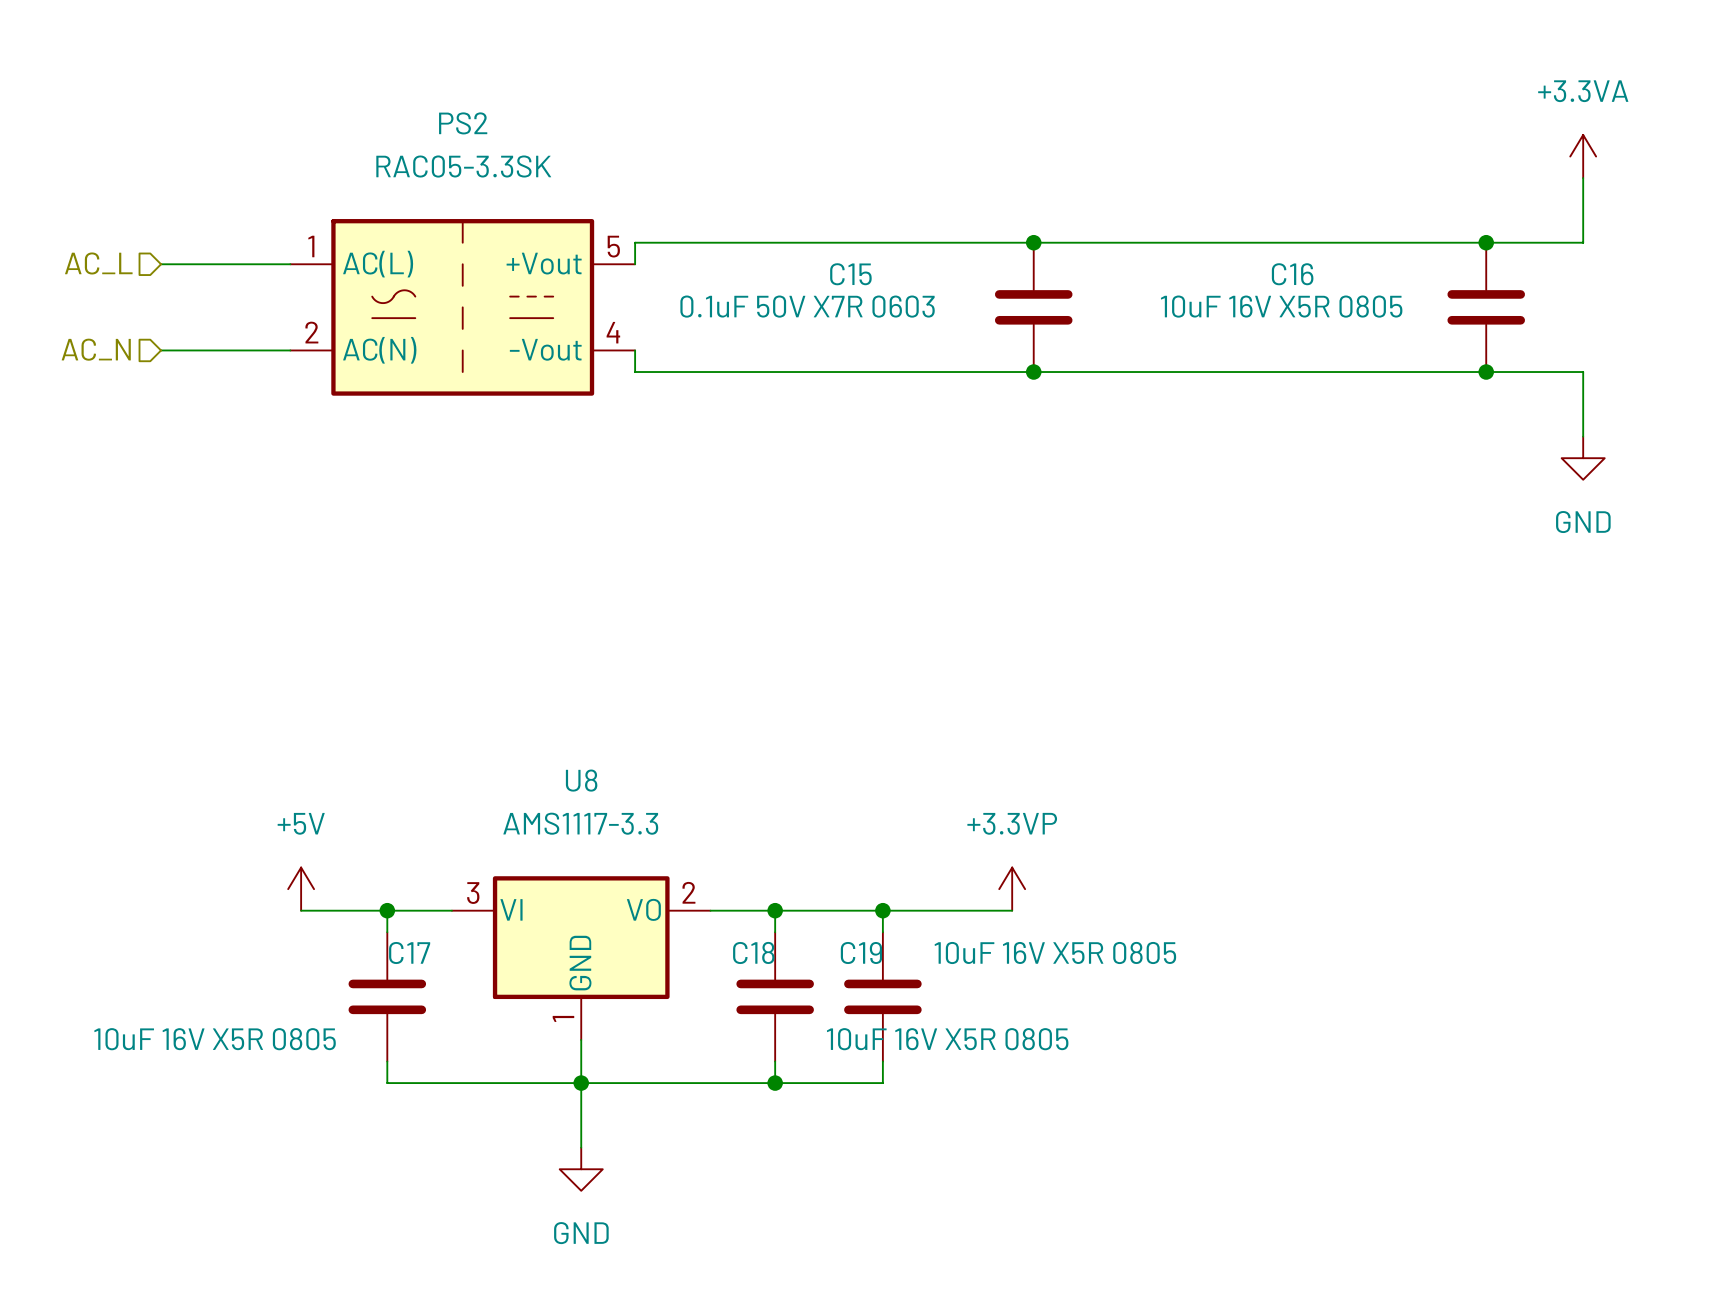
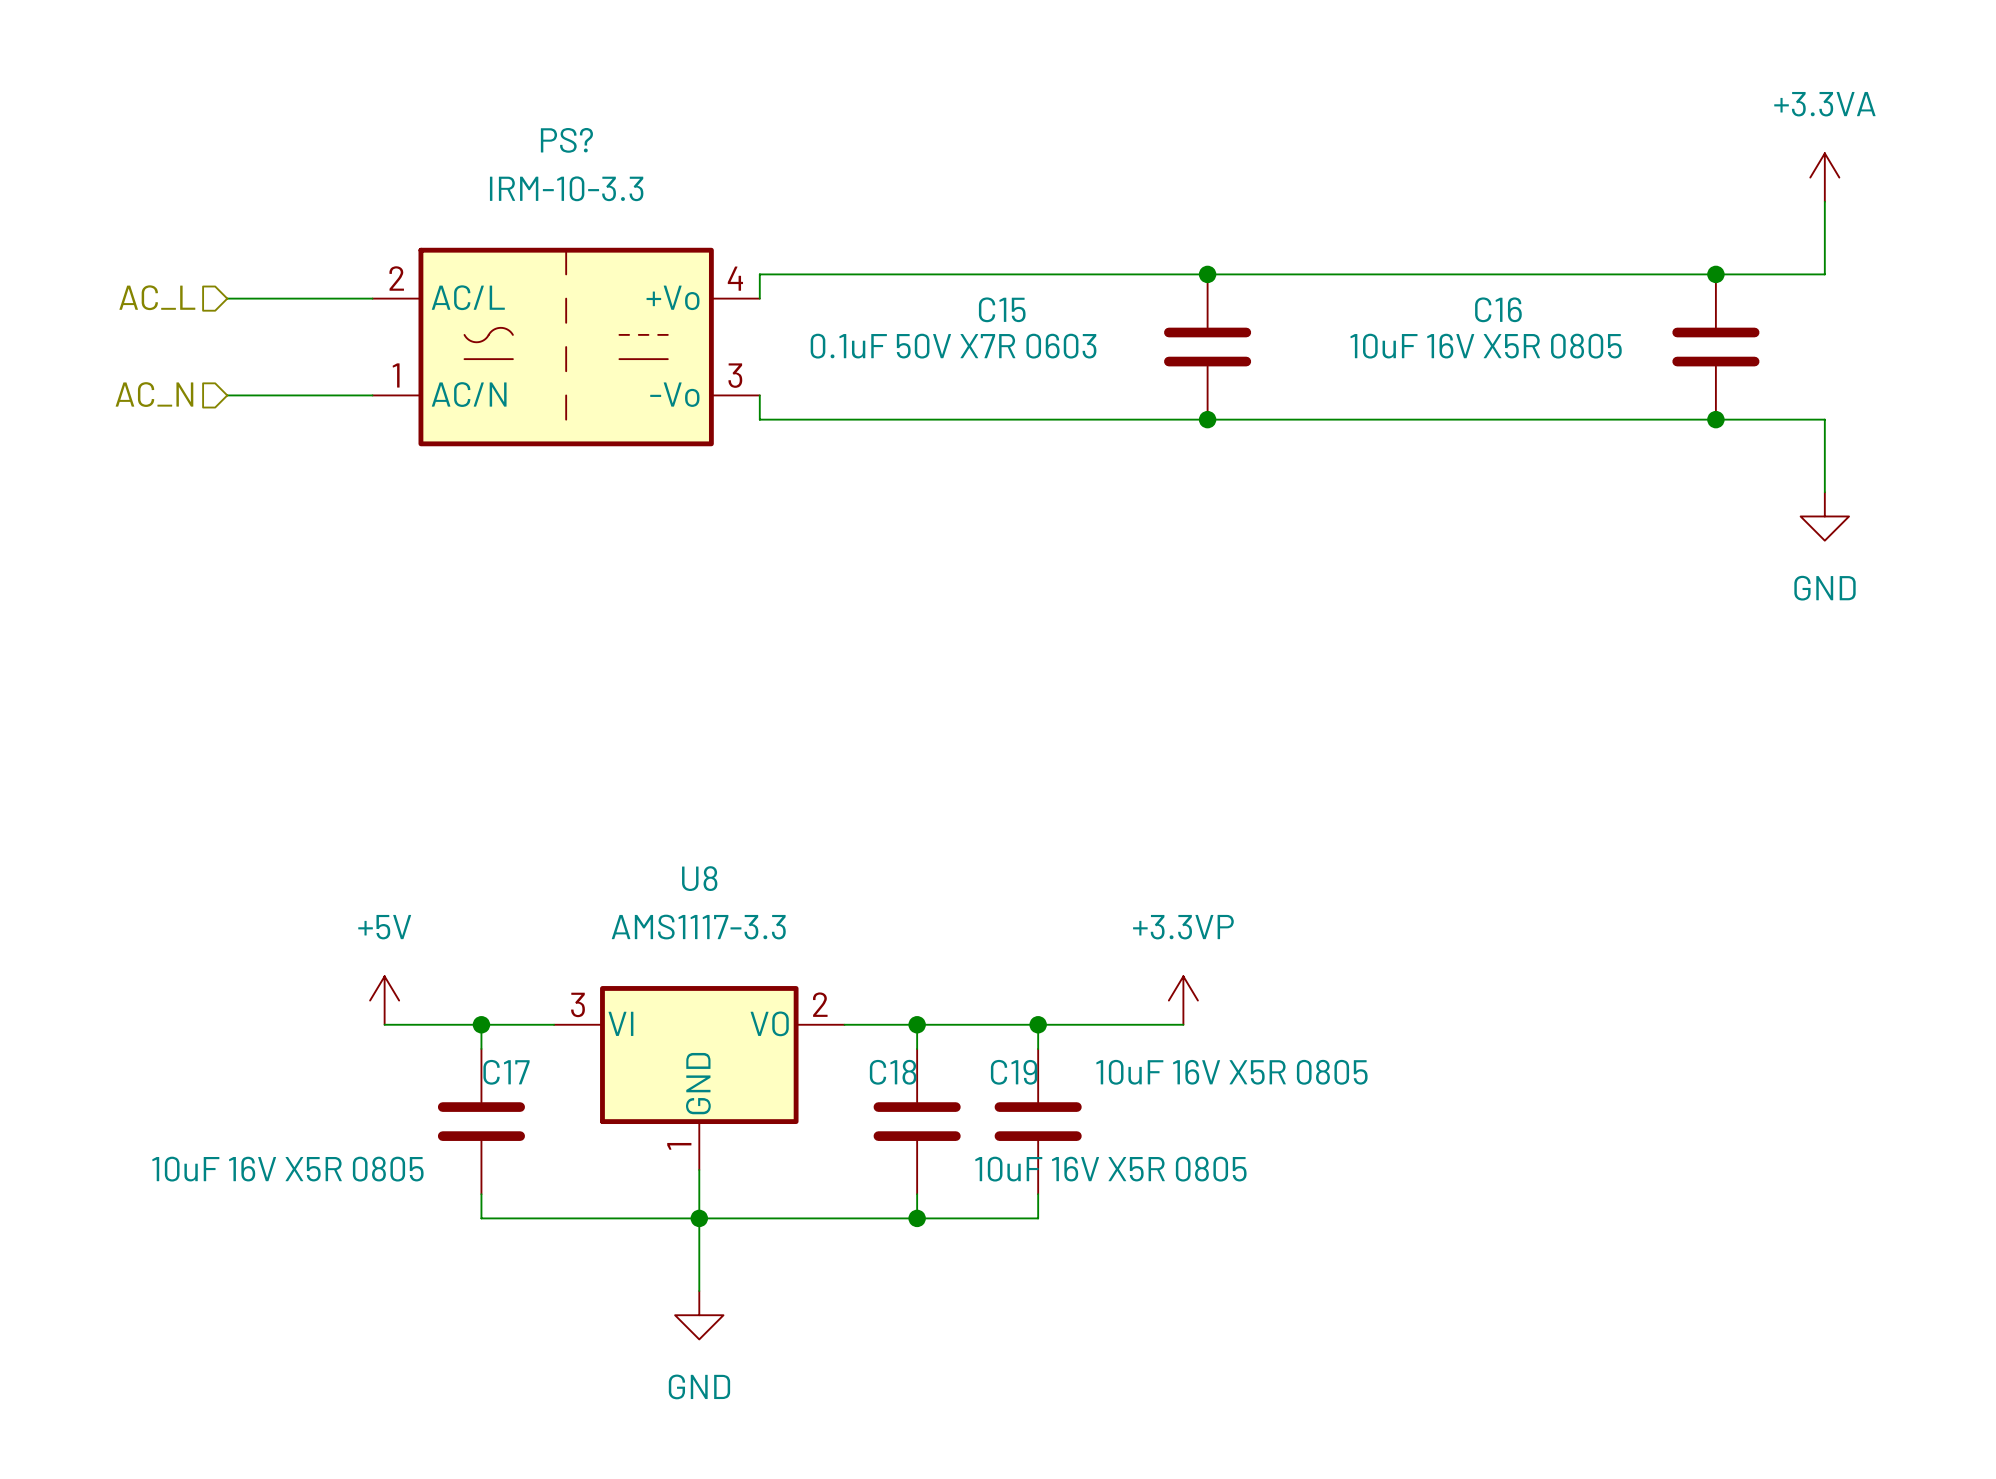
PS2 name: PS2 (463, 123) -> PS? (566, 140)
PS2 value: RAC05-3.3SK (463, 166) -> IRM-10-3.3 (566, 188)
PS2 pin number: 1 (311, 246) -> 2 (396, 278)
PS2 pin number: 5 (613, 246) -> 4 (735, 278)
PS2 pin name: +Vout (544, 263) -> +Vo (673, 297)
PS2 pin name: AC(L) (378, 264) -> AC/L (468, 297)
PS2 pin number: 2 (311, 332) -> 1 (396, 375)
PS2 pin number: 4 (613, 332) -> 3 (735, 375)
PS2 pin name: -Vout (545, 349) -> -Vo (674, 394)
PS2 pin name: AC(N) (379, 350) -> AC/N (469, 394)

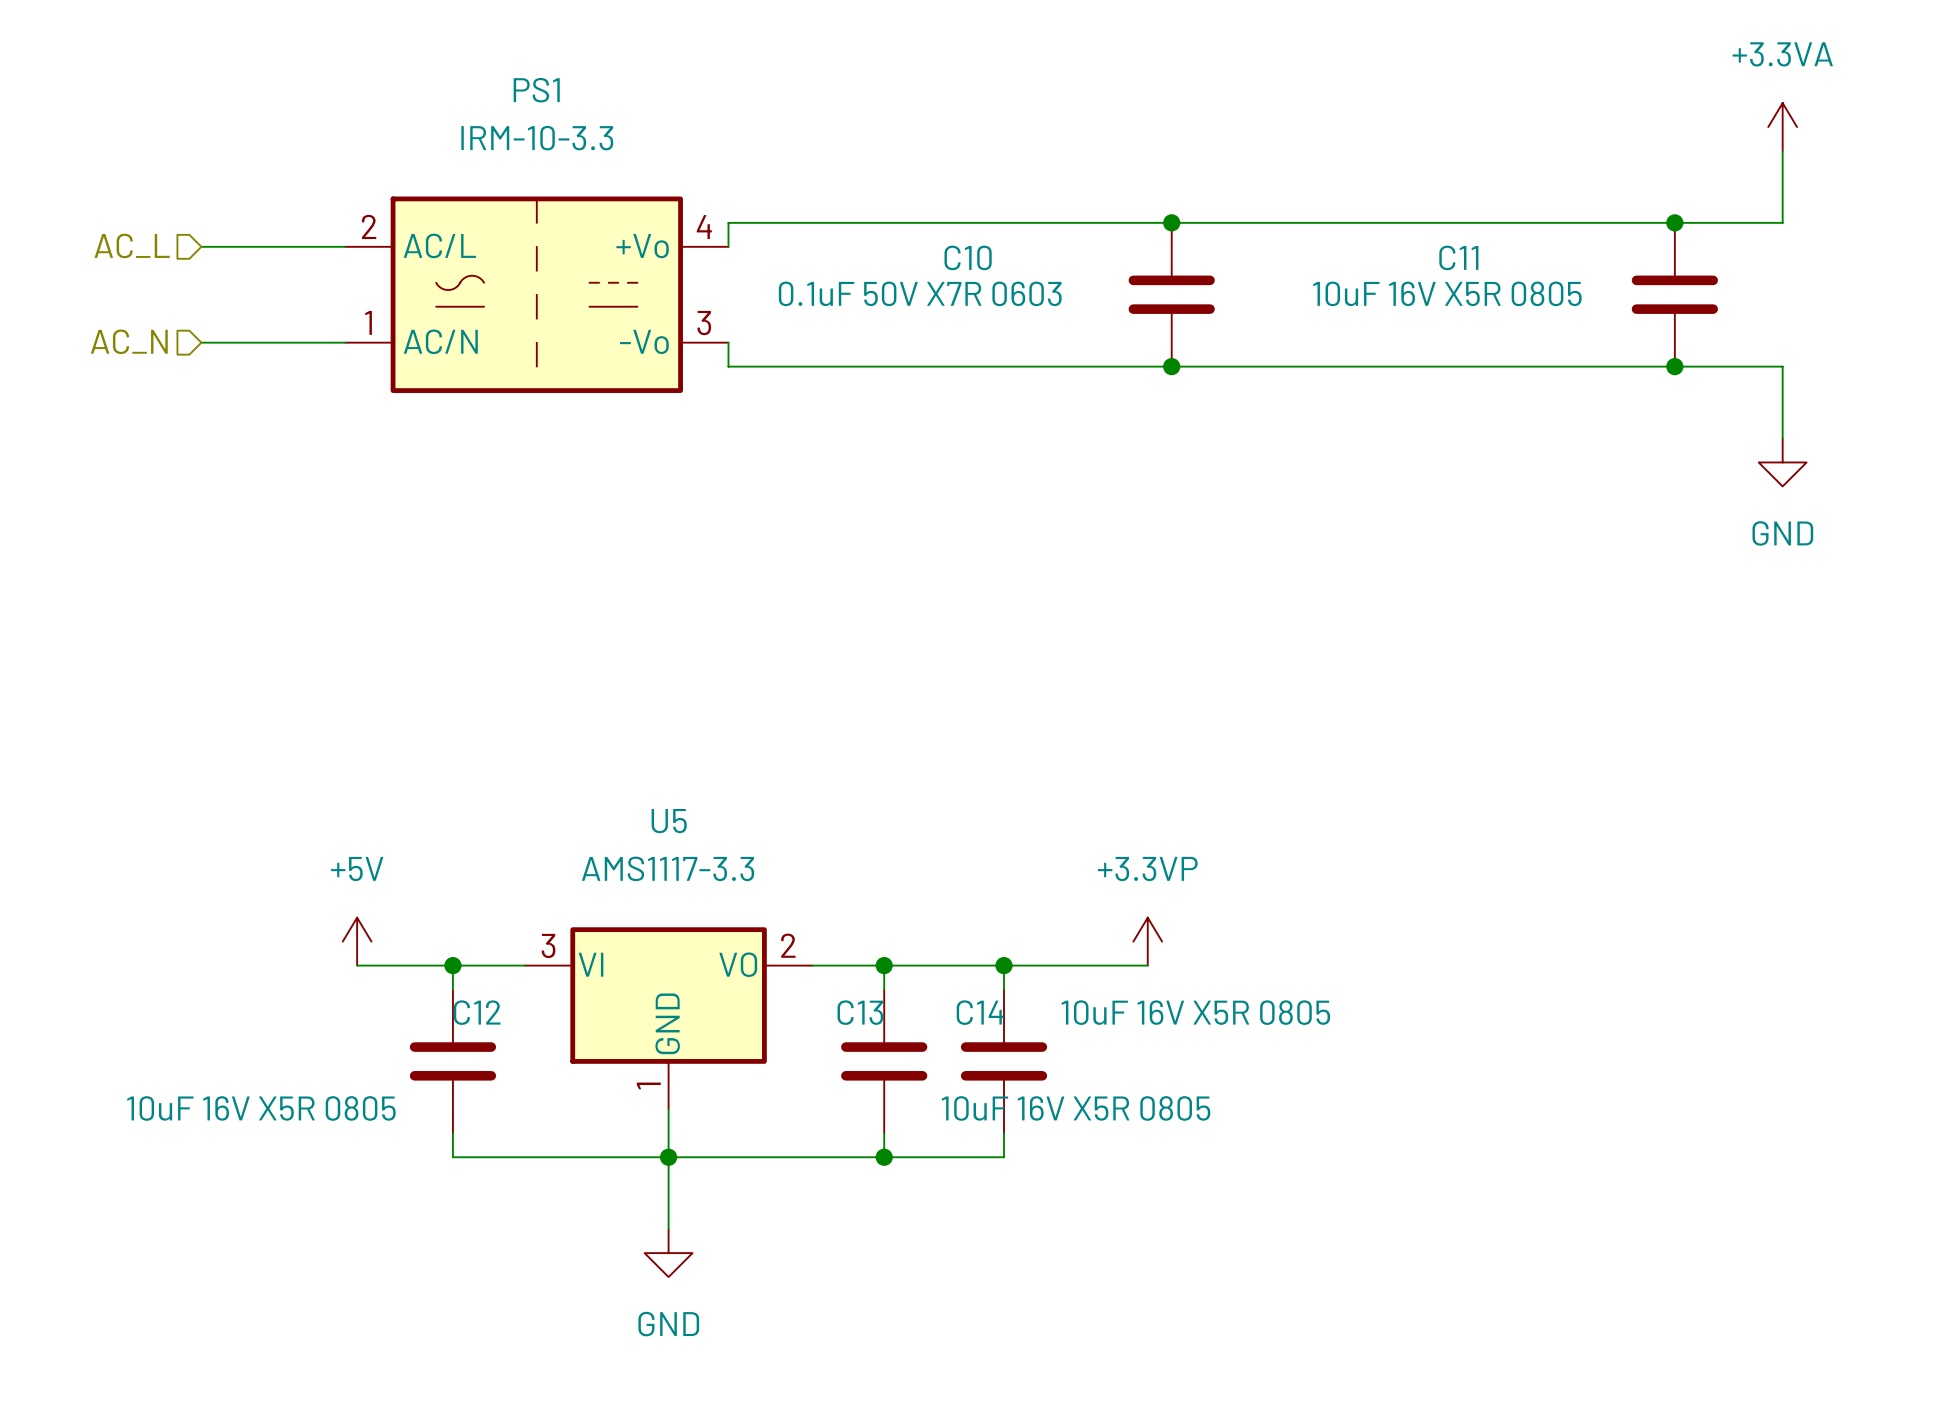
PS? name: PS? (566, 140) -> PS1 (536, 90)
C15 name: C15 (1002, 309) -> C10 (968, 257)
C16 name: C16 (1498, 309) -> C11 (1458, 257)
U8 name: U8 (699, 878) -> U5 (669, 821)
C17 name: C17 (506, 1072) -> C12 (477, 1012)
C18 name: C18 (893, 1072) -> C13 (860, 1012)
C19 name: C19 (1014, 1072) -> C14 (980, 1012)

